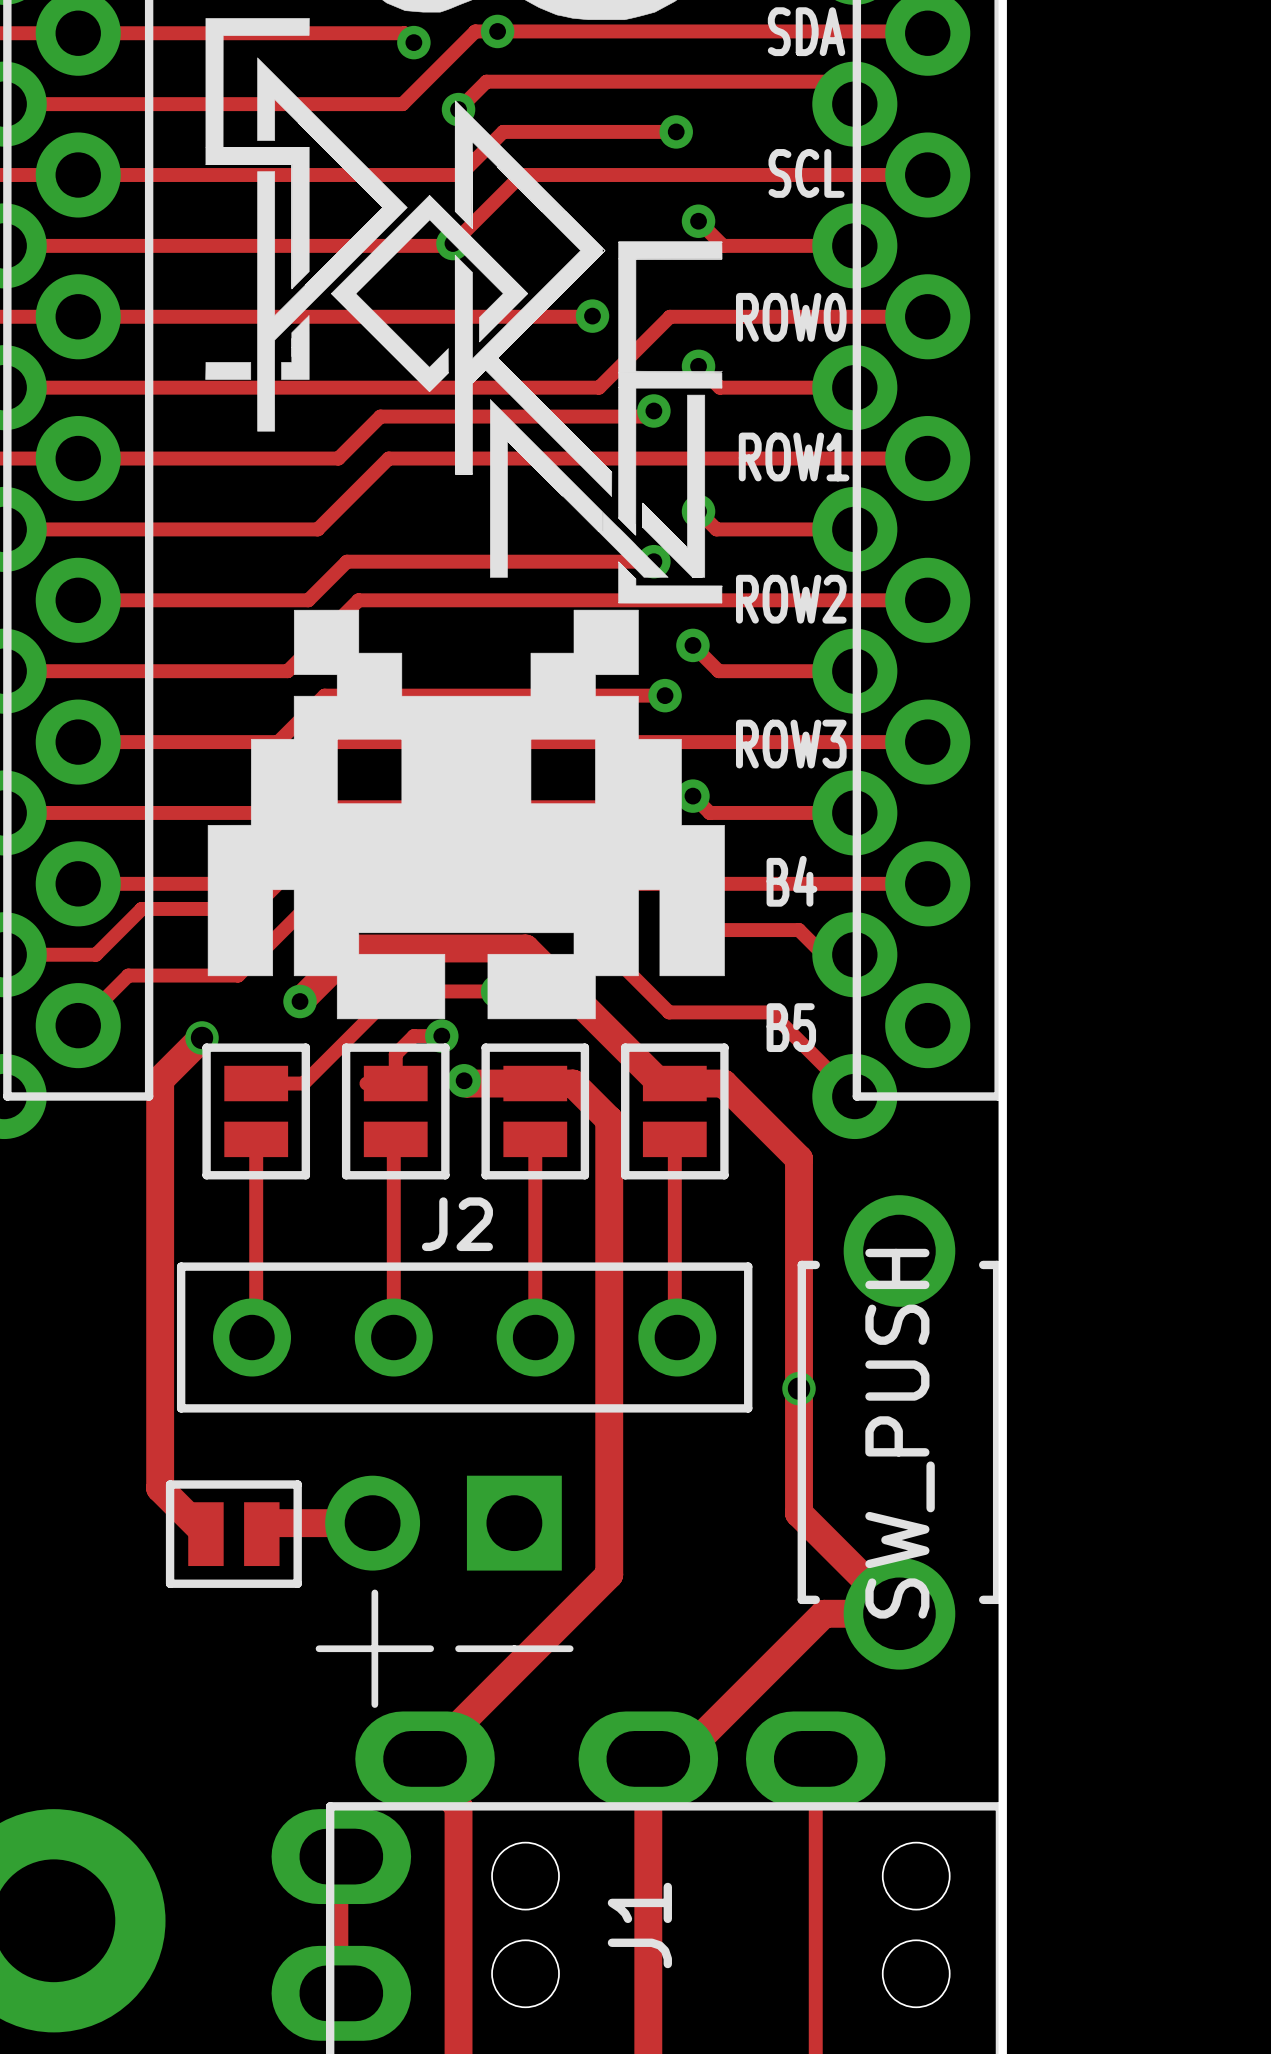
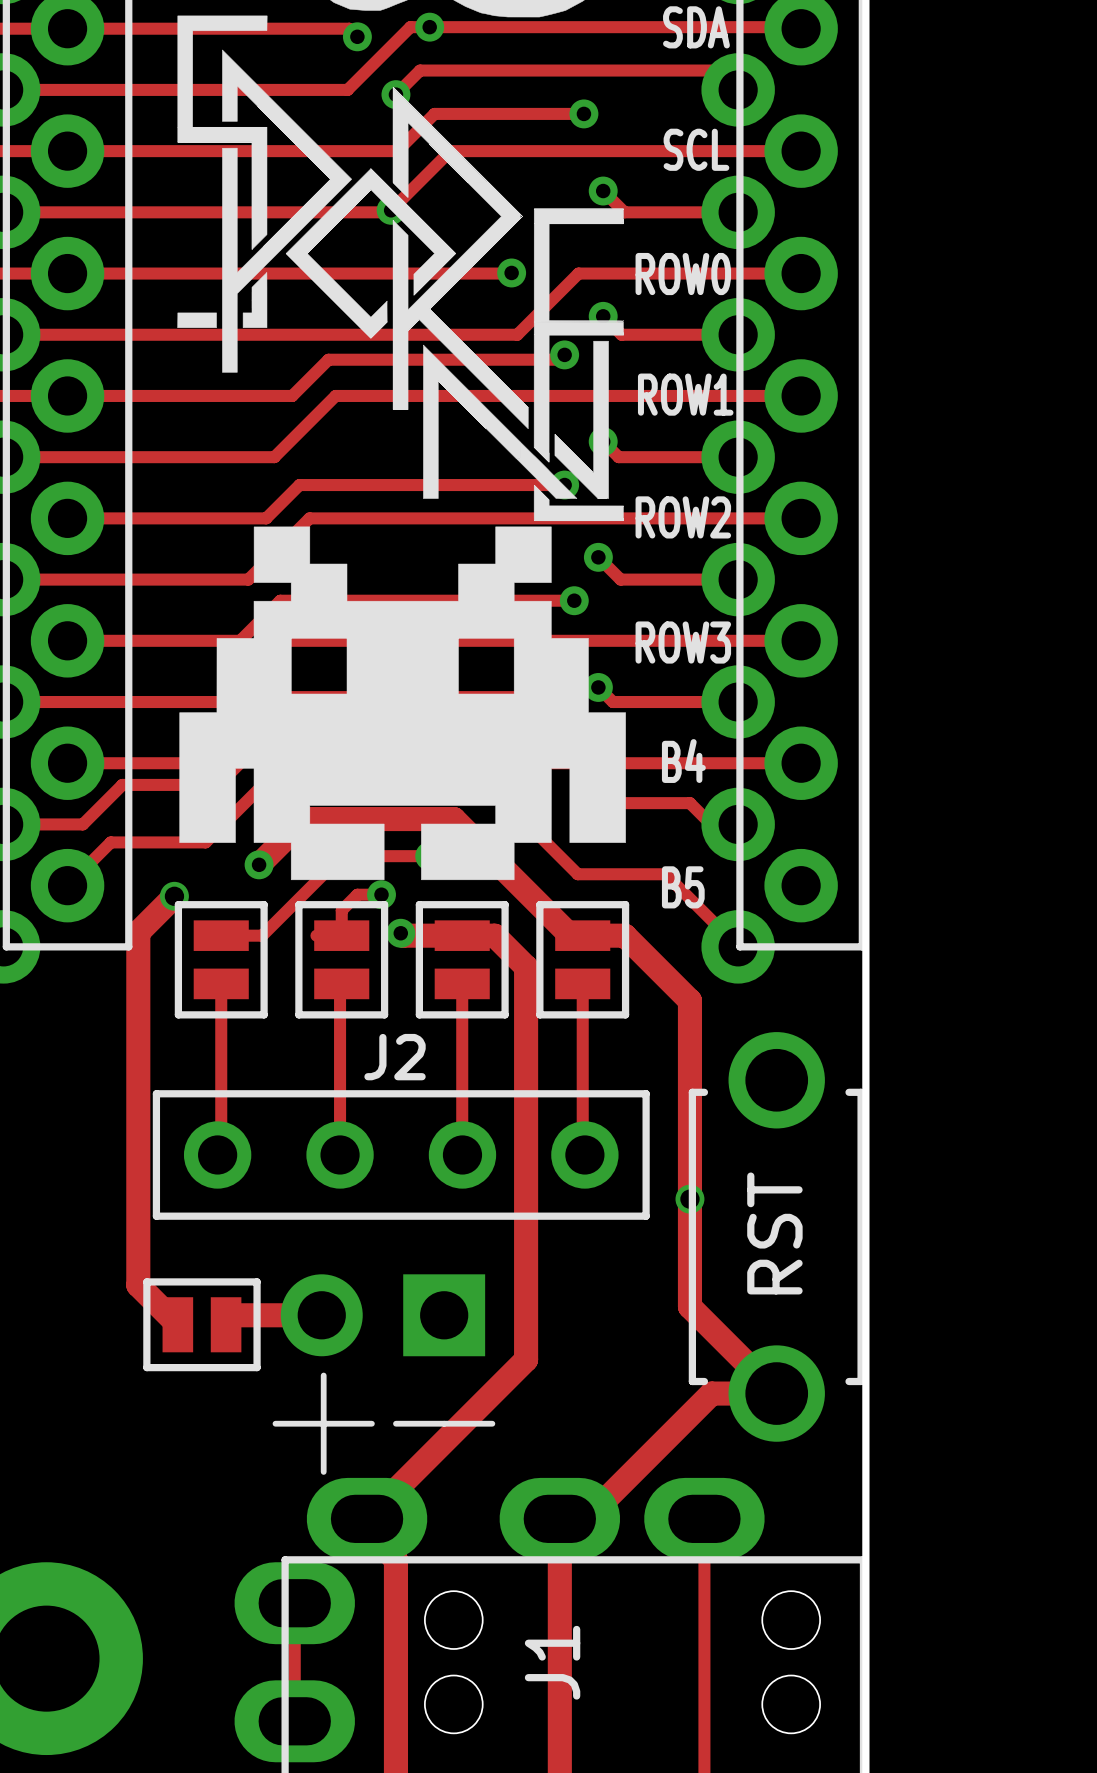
part value: SW_PUSH (900, 1433) -> RST (774, 1233)

